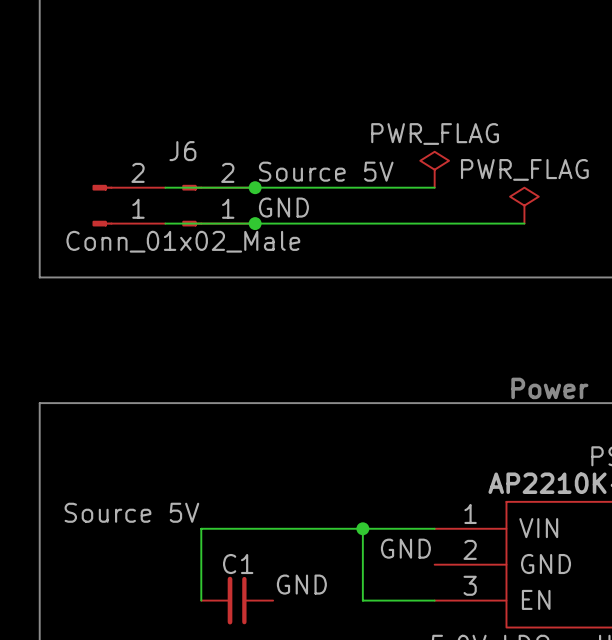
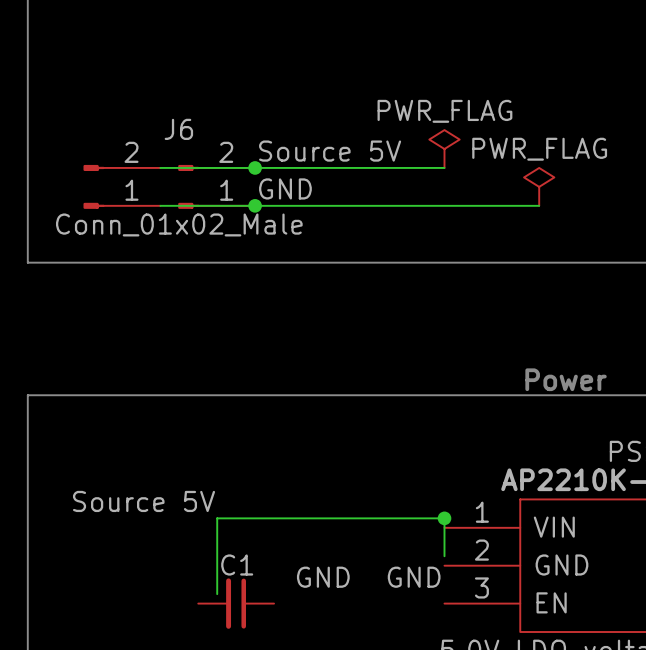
label position: Source 5V (131, 512) -> Source 5V (144, 501)
wire: (362, 528) (362, 600) (434, 600) -> none
junction position: (362, 528) -> (444, 518)
wire: (434, 528) (201, 528) (201, 600) -> none
label position: GND (405, 548) -> GND (414, 577)
wire: none -> (444, 556) (444, 518) (217, 518) (217, 594)
label position: GND (301, 584) -> GND (323, 577)

